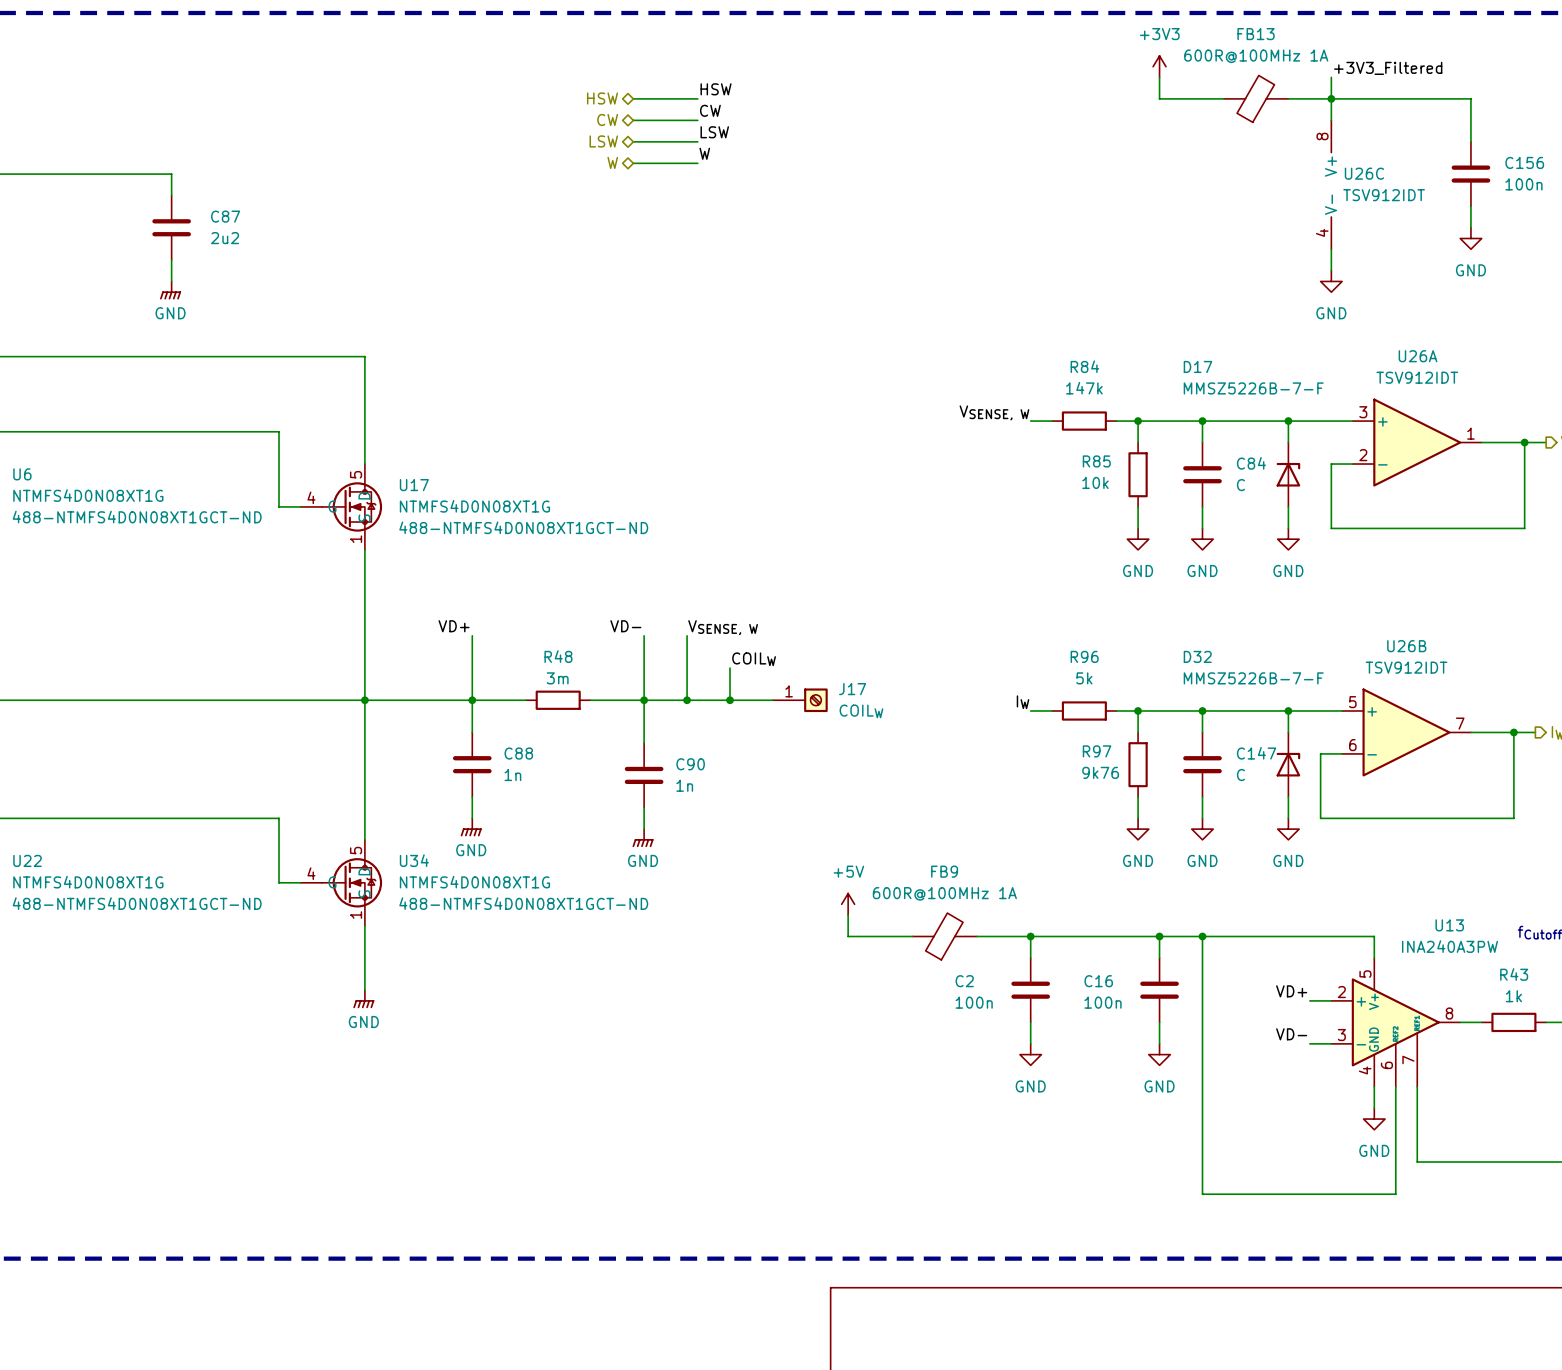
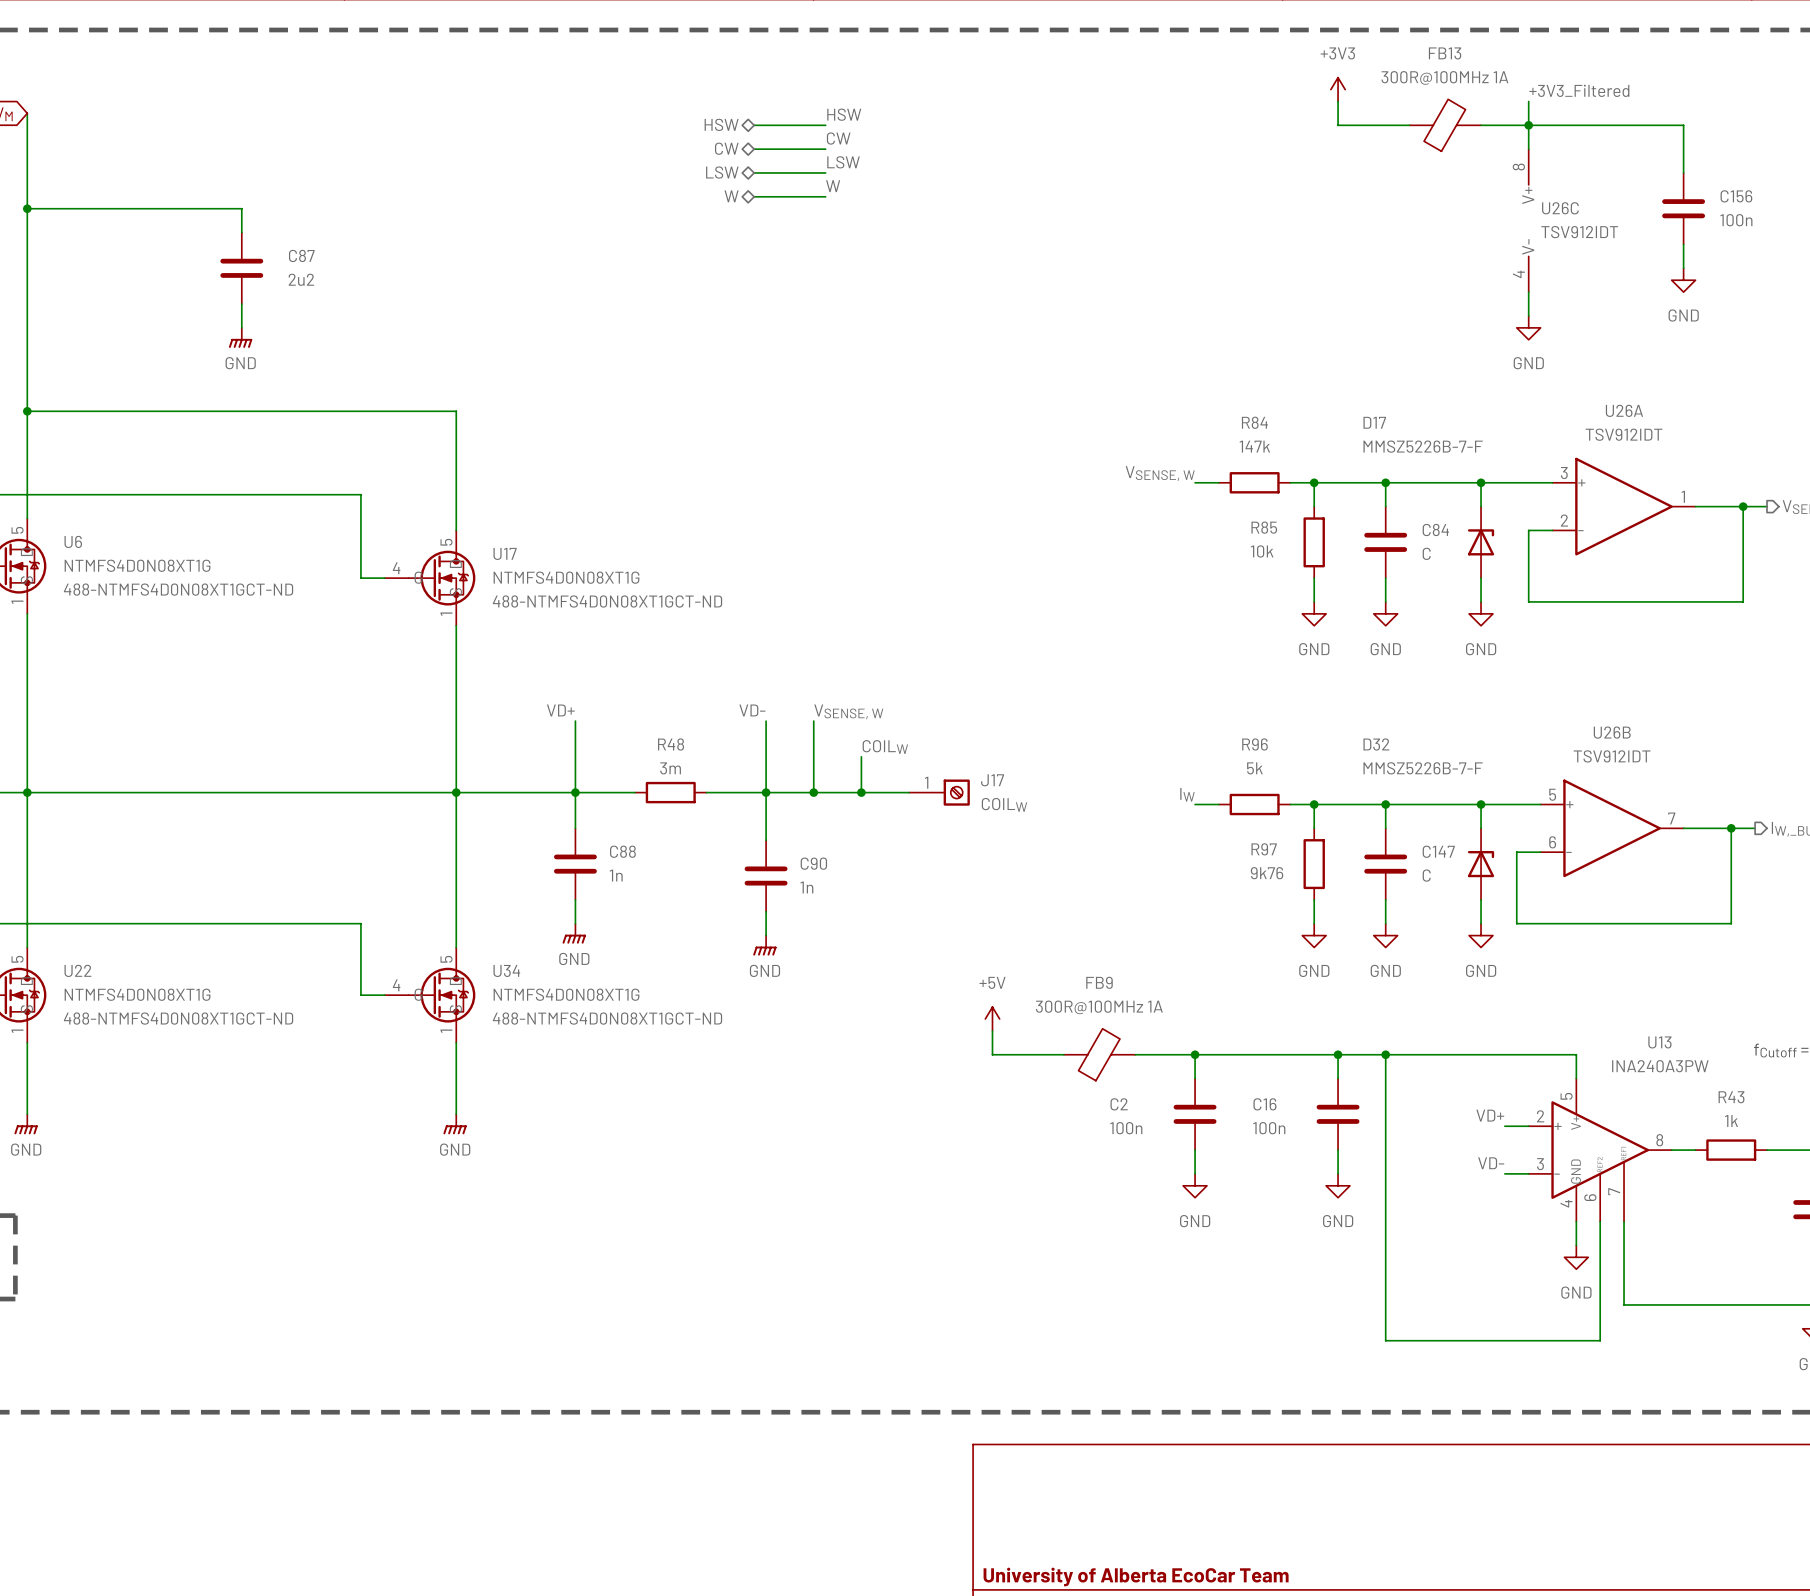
FB13 value: 600R@100MHz 1A (1256, 56) -> 300R@100MHz 1A (1444, 77)
FB9 value: 600R@100MHz 1A (944, 893) -> 300R@100MHz 1A (1099, 1007)

